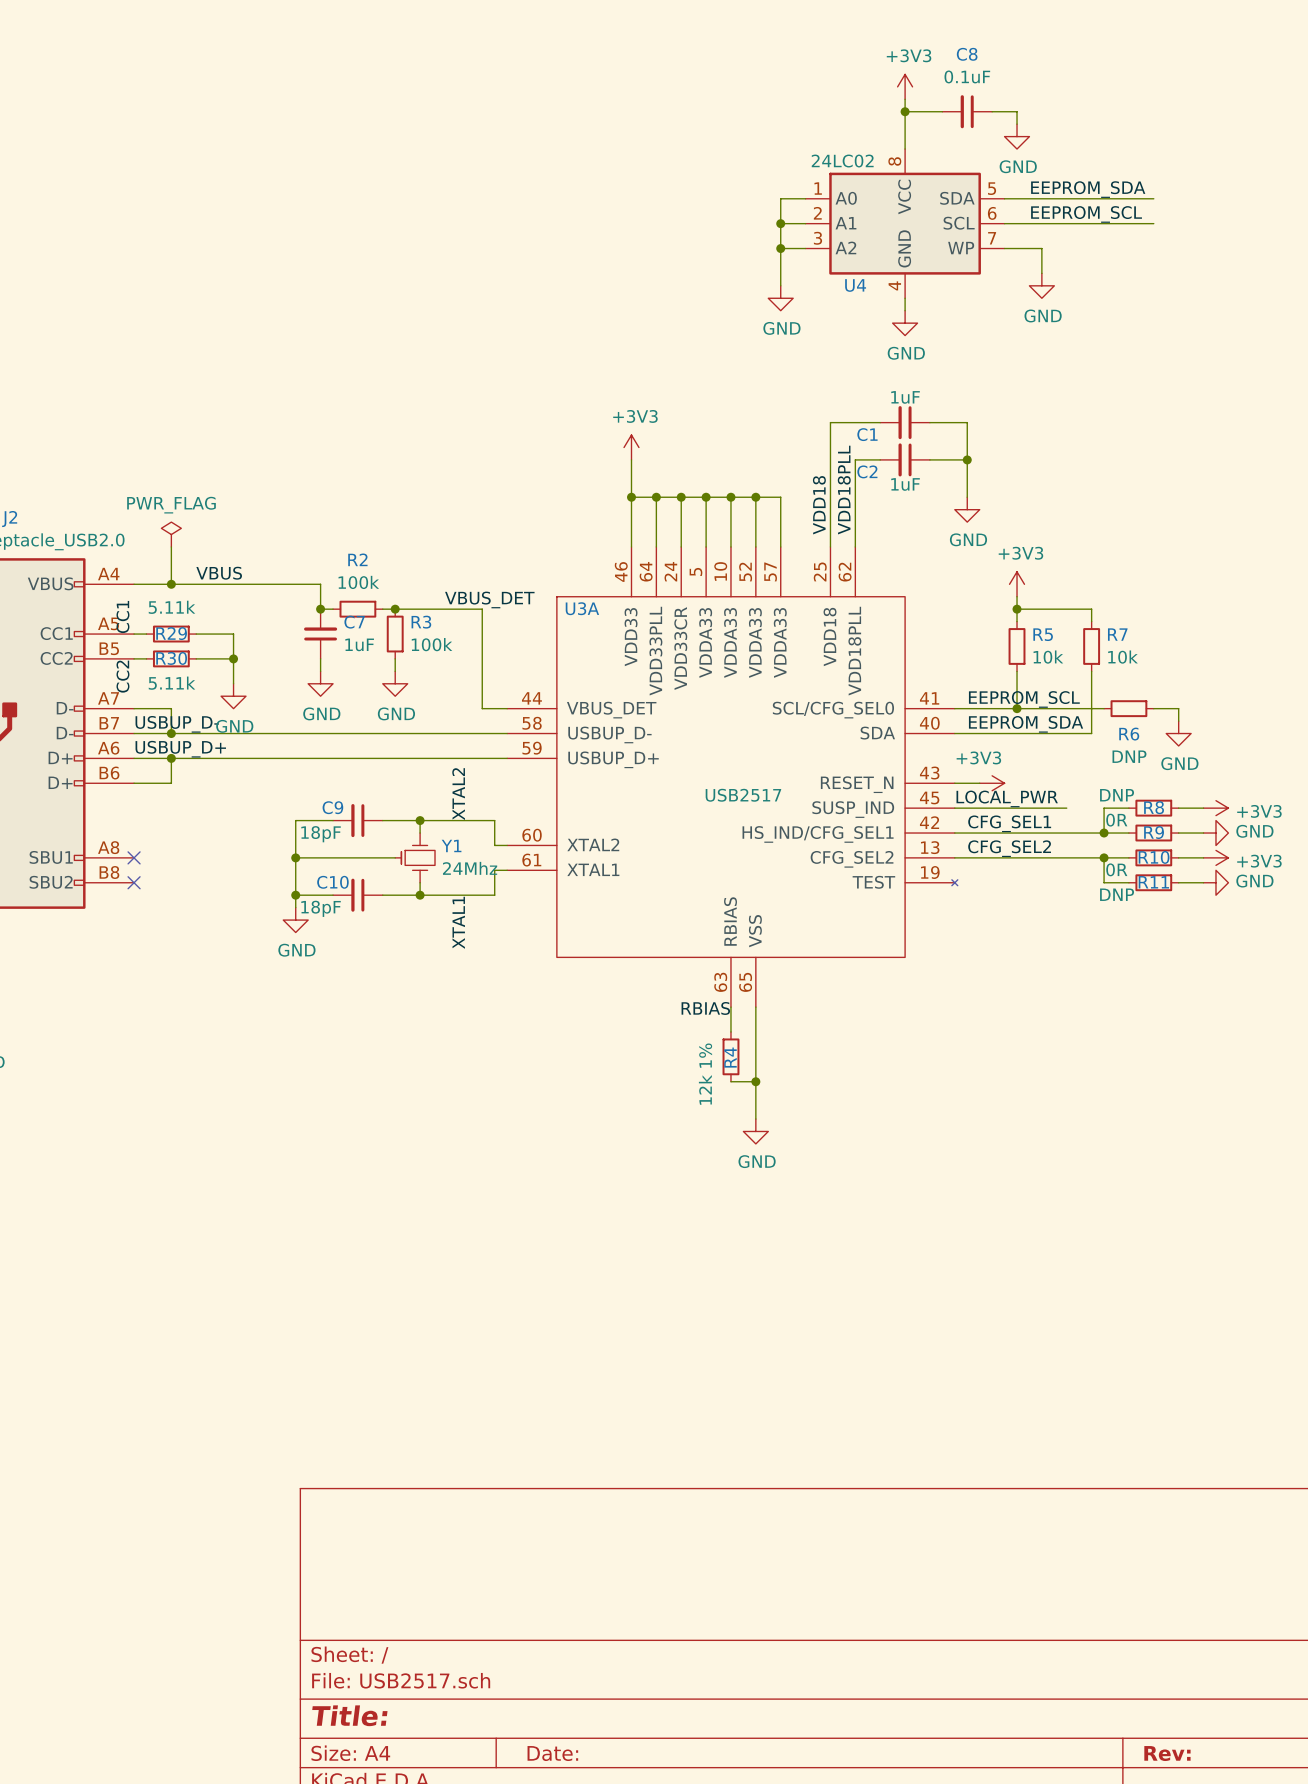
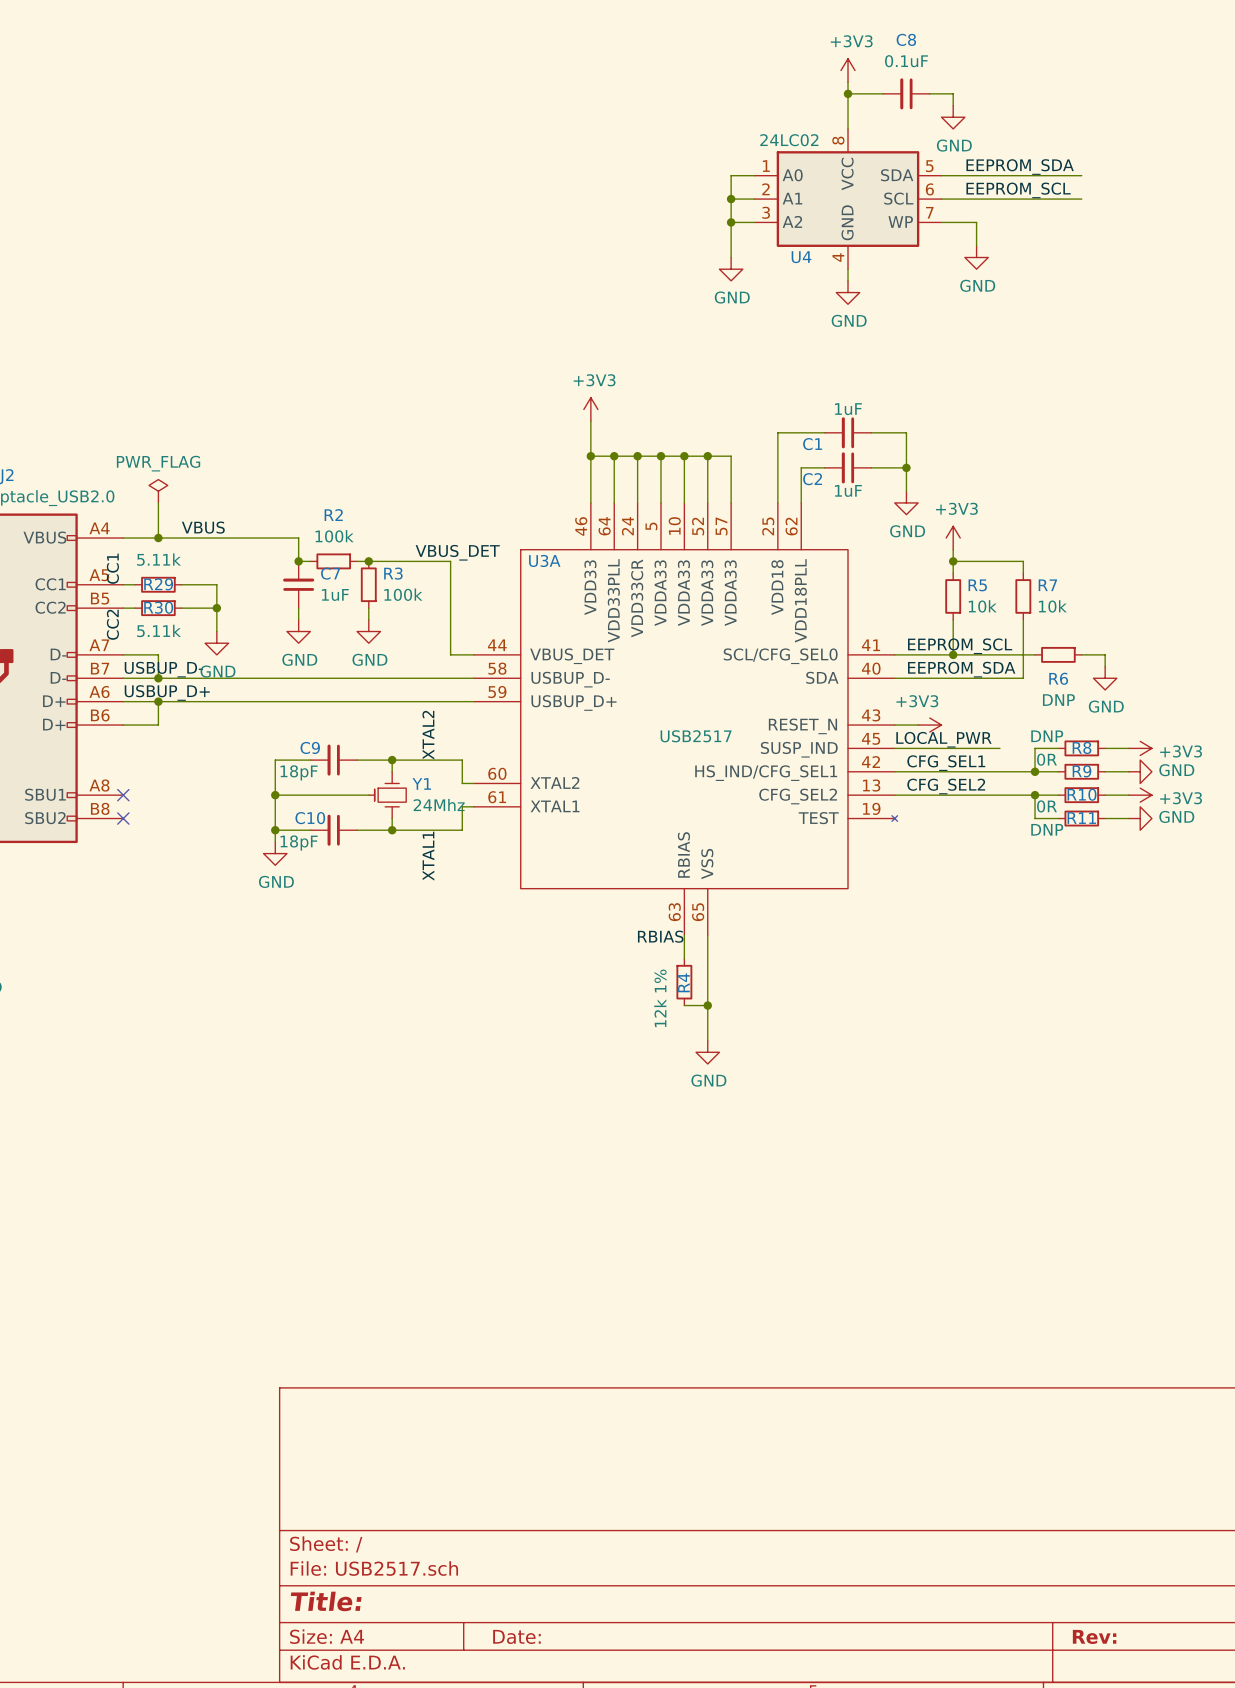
wire: (880, 422) (830, 422) (830, 472) -> (824, 432) (777, 432)
C1 position: (905, 422) -> (848, 432)
wire: (929, 422) (967, 422) (967, 472) -> (871, 432) (906, 432)
wire: (880, 459) (855, 459) (855, 509) -> (824, 467) (801, 467)
C2 position: (905, 459) -> (848, 467)
wire: (929, 459) (967, 459) -> (871, 467) (906, 467)
junction position: (967, 459) -> (906, 467)
label: VDD18PLL (844, 490) -> none
wire: none -> (906, 456) (906, 491)
label: VDD18 (819, 505) -> none
power symbol position: GND (967, 509) -> GND (906, 502)

